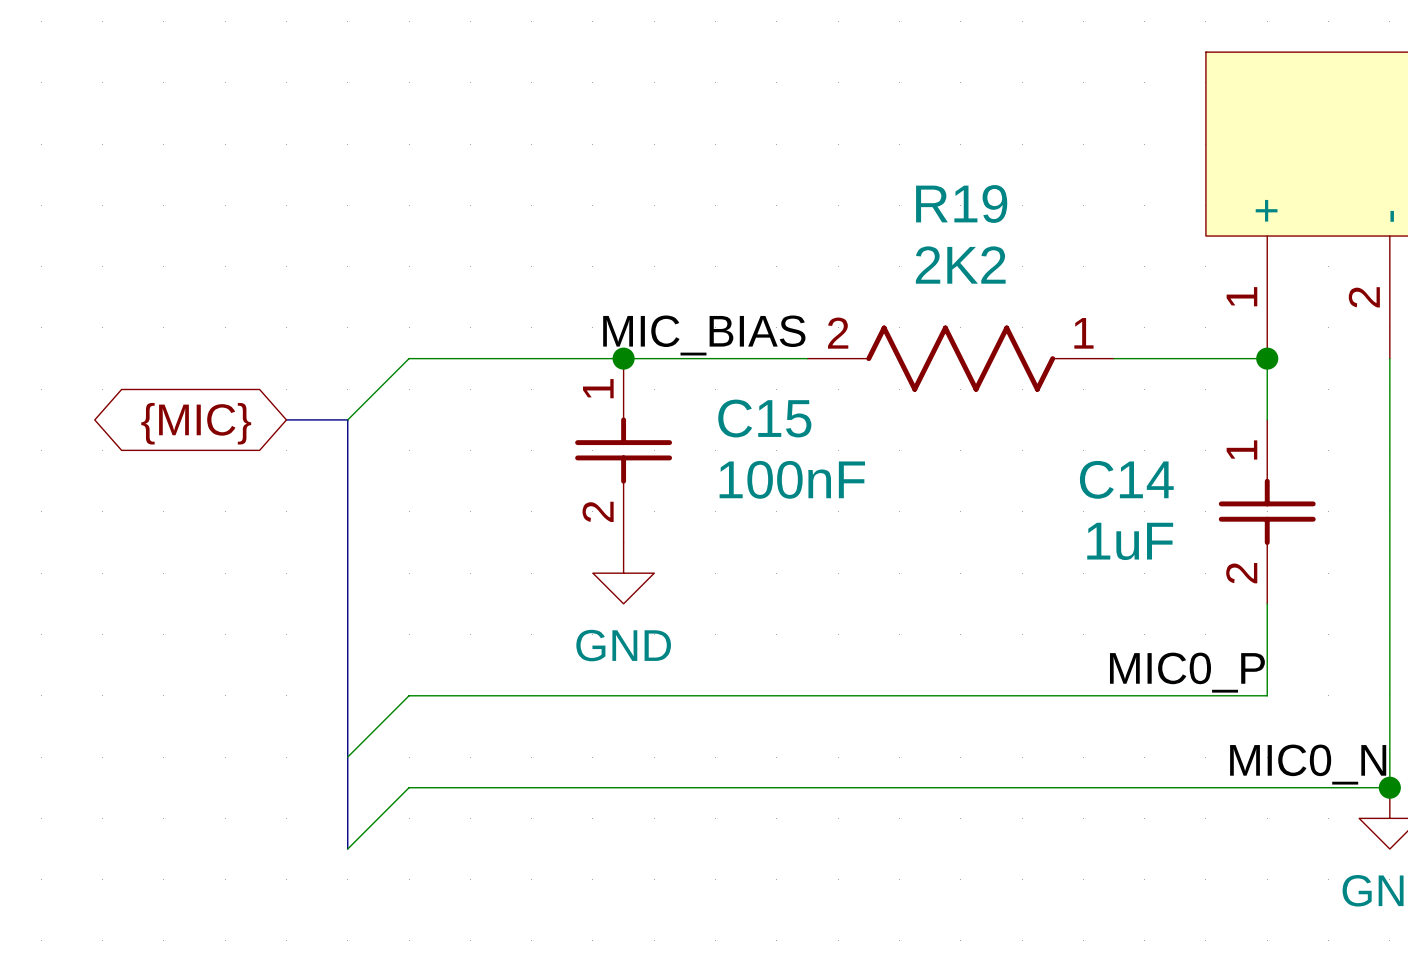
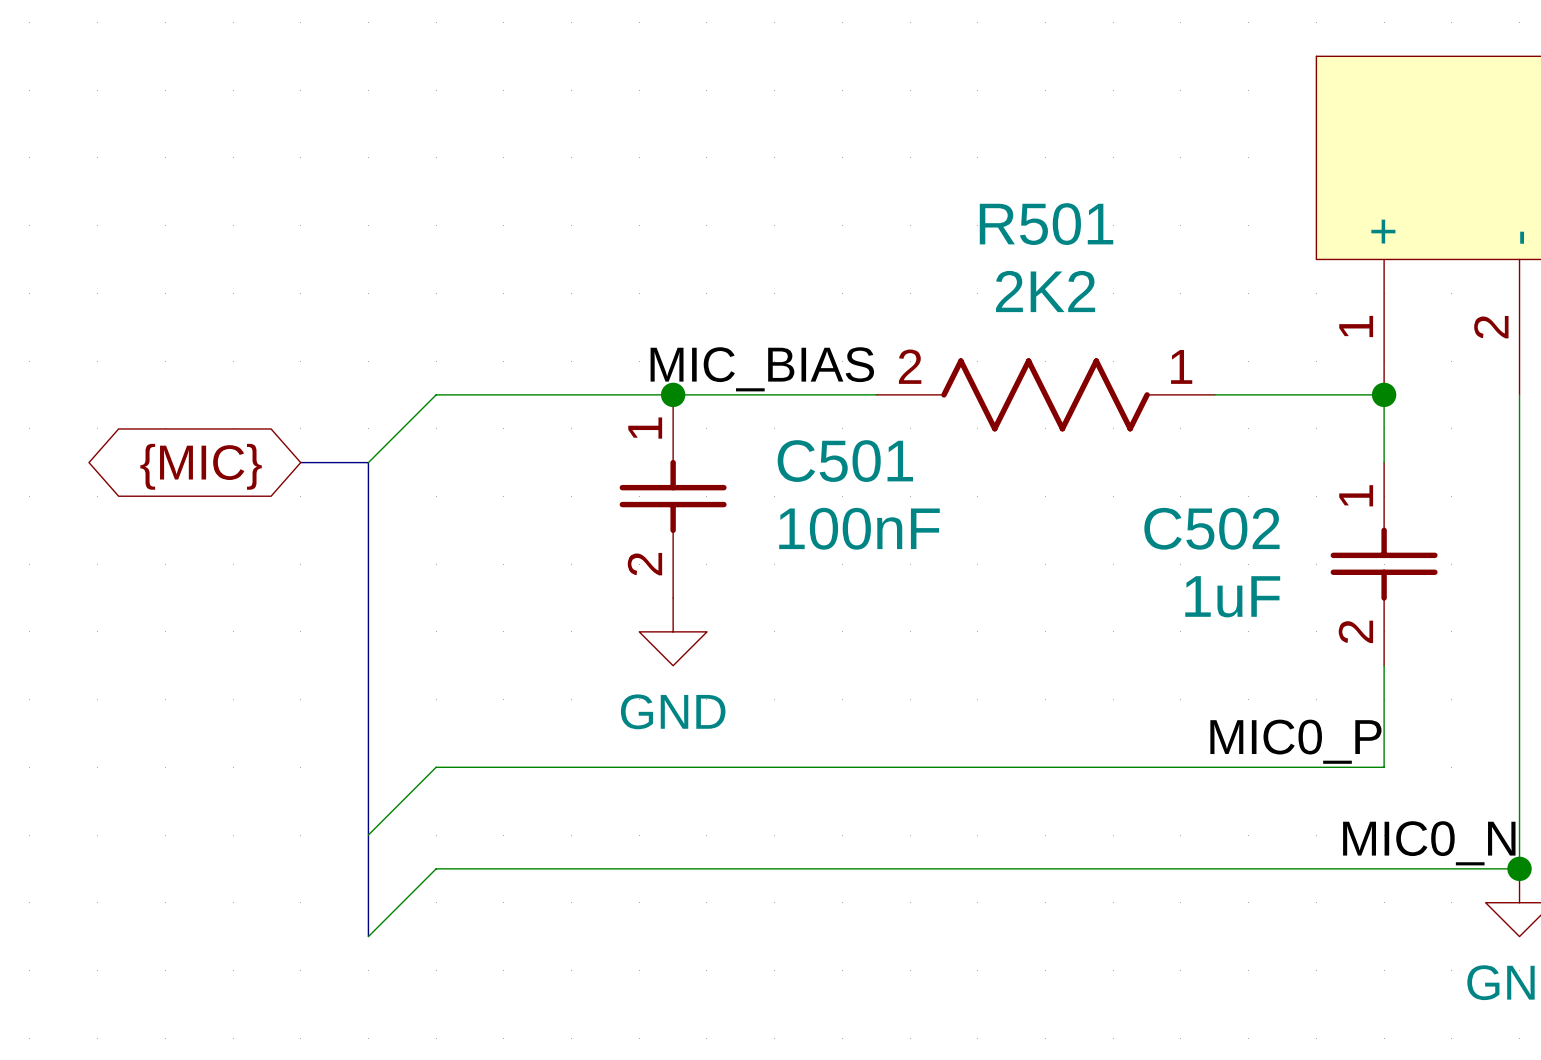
R19 name: R19 (961, 203) -> R501 (1046, 224)
C15 name: C15 (764, 418) -> C501 (845, 461)
C14 name: C14 (1126, 479) -> C502 (1211, 528)

